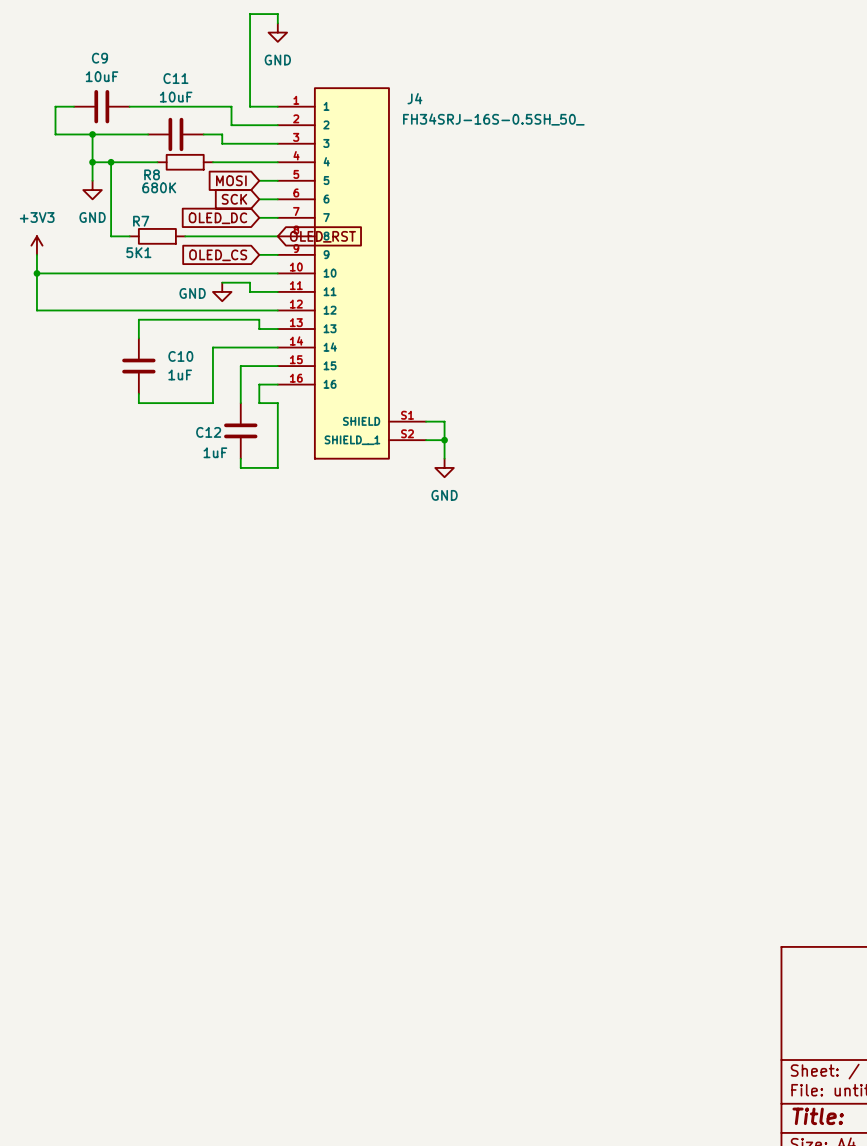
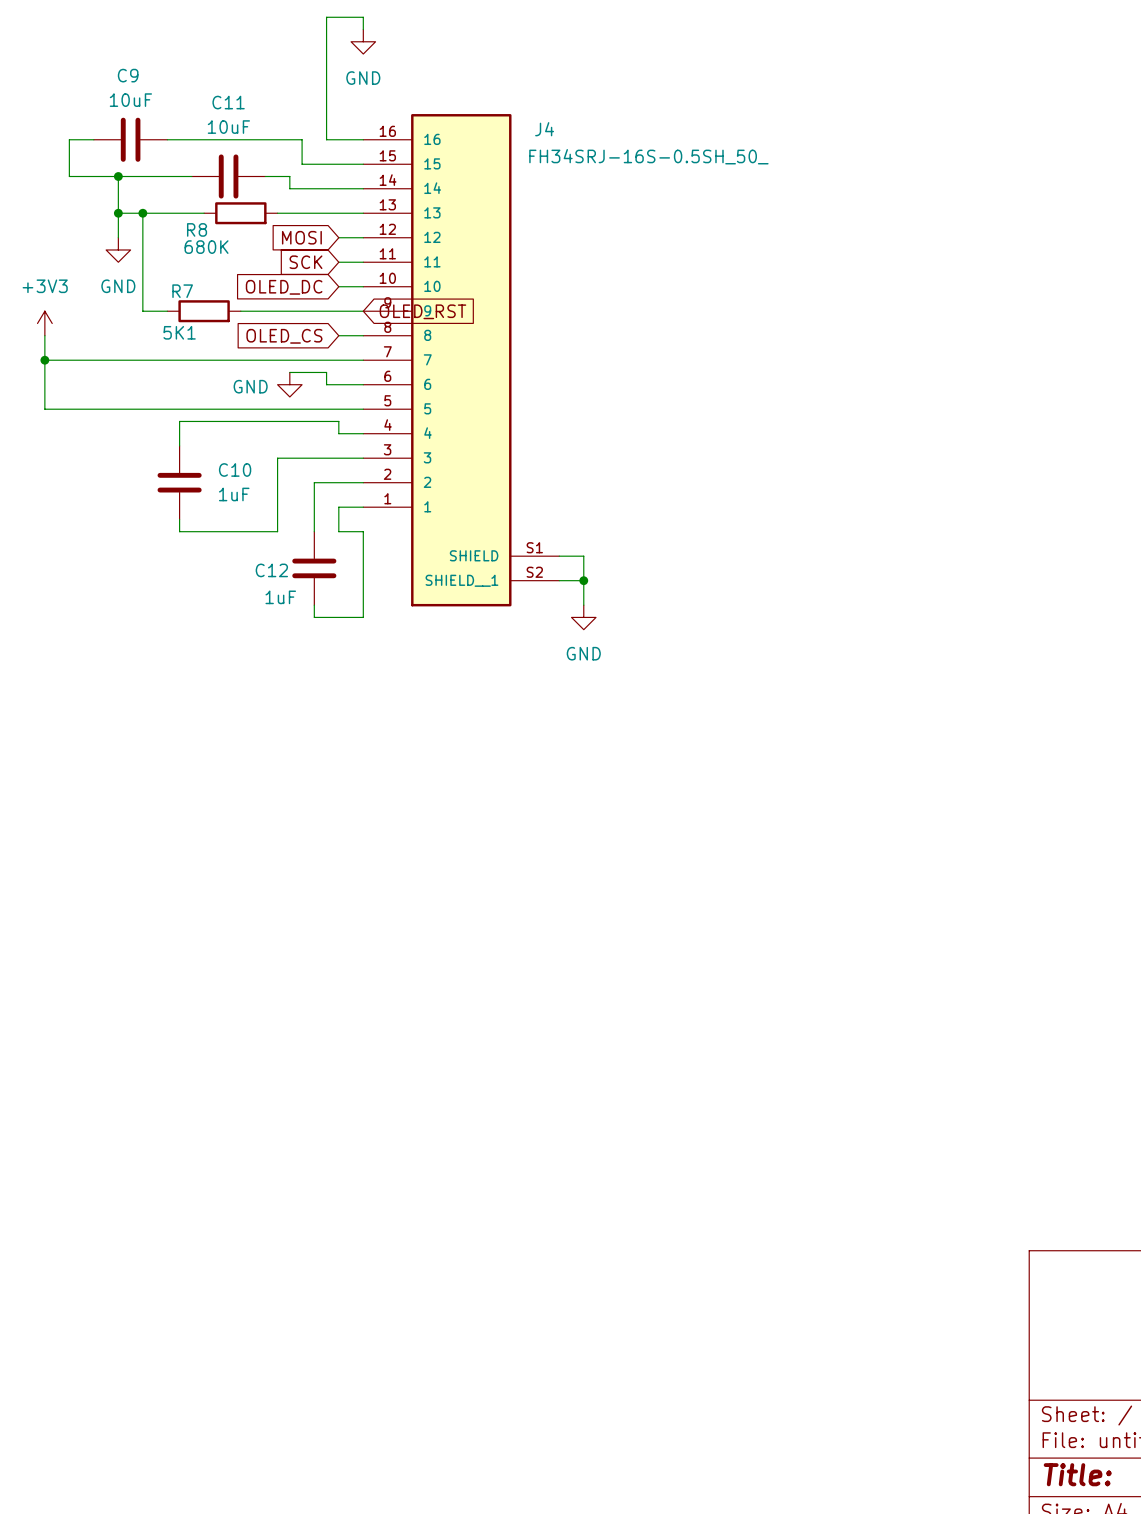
J4 symbol: [277, 87, 427, 460] -> [363, 114, 560, 607]

